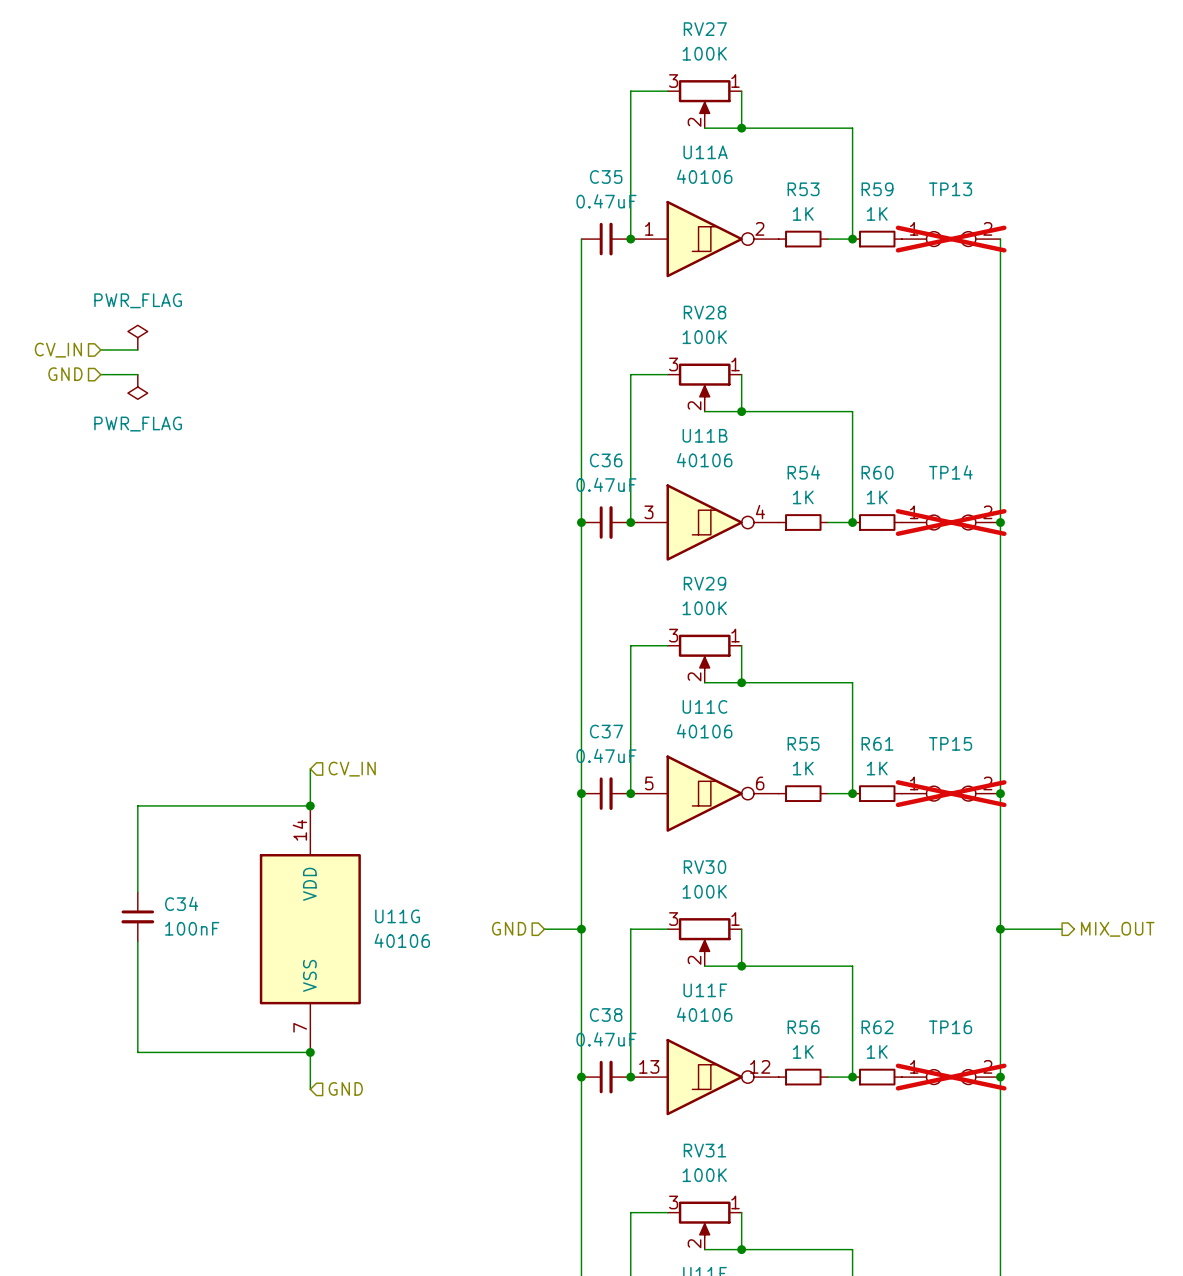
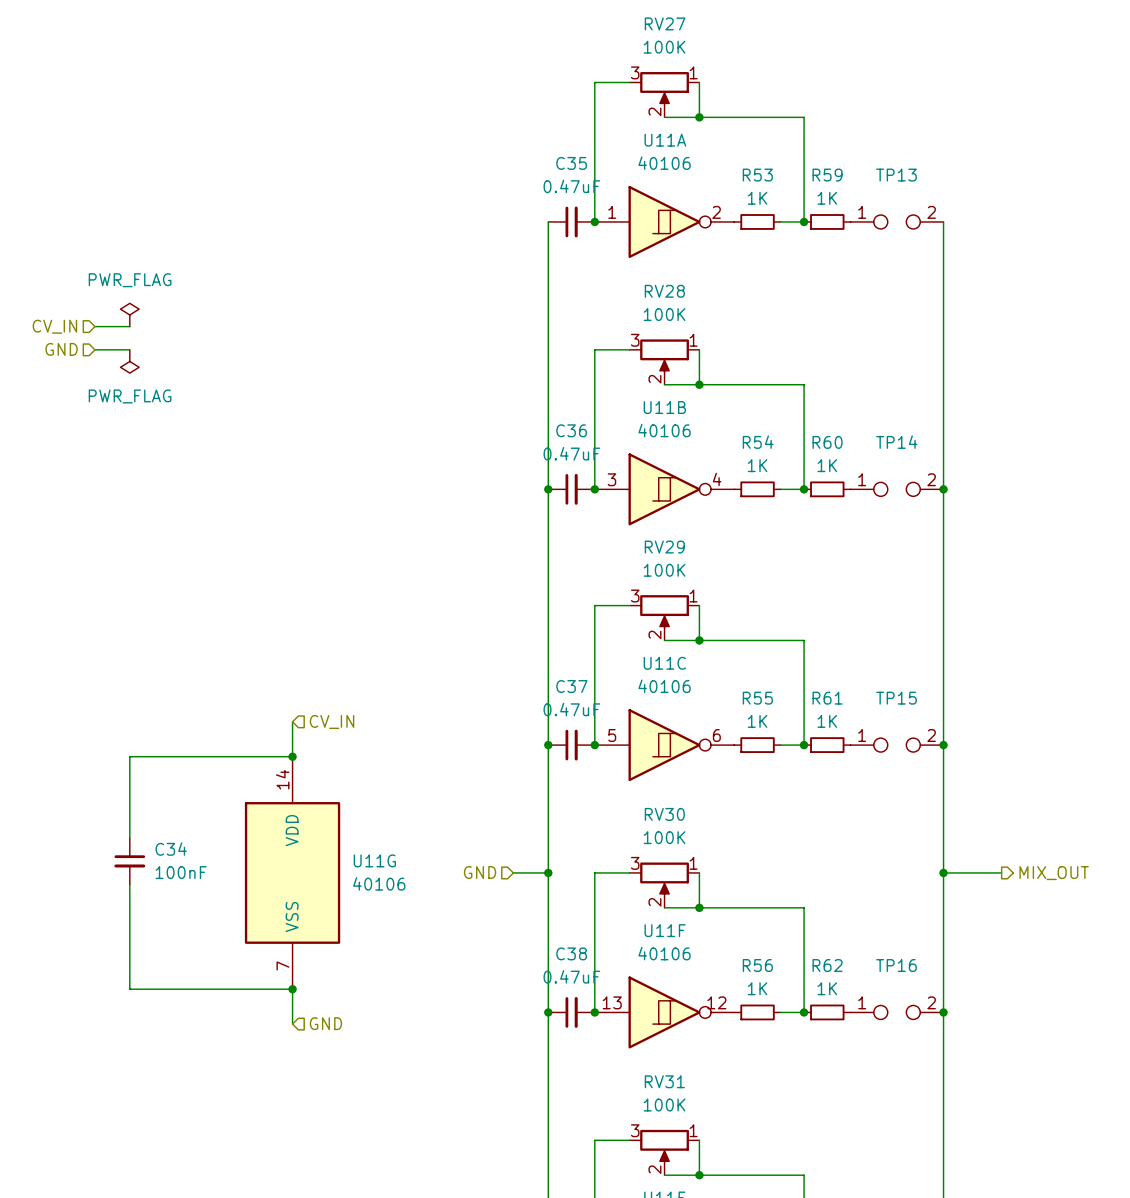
TP13 do-not-place cross: (951, 239) -> none
TP14 do-not-place cross: (951, 522) -> none
TP15 do-not-place cross: (951, 793) -> none
TP16 do-not-place cross: (951, 1077) -> none

